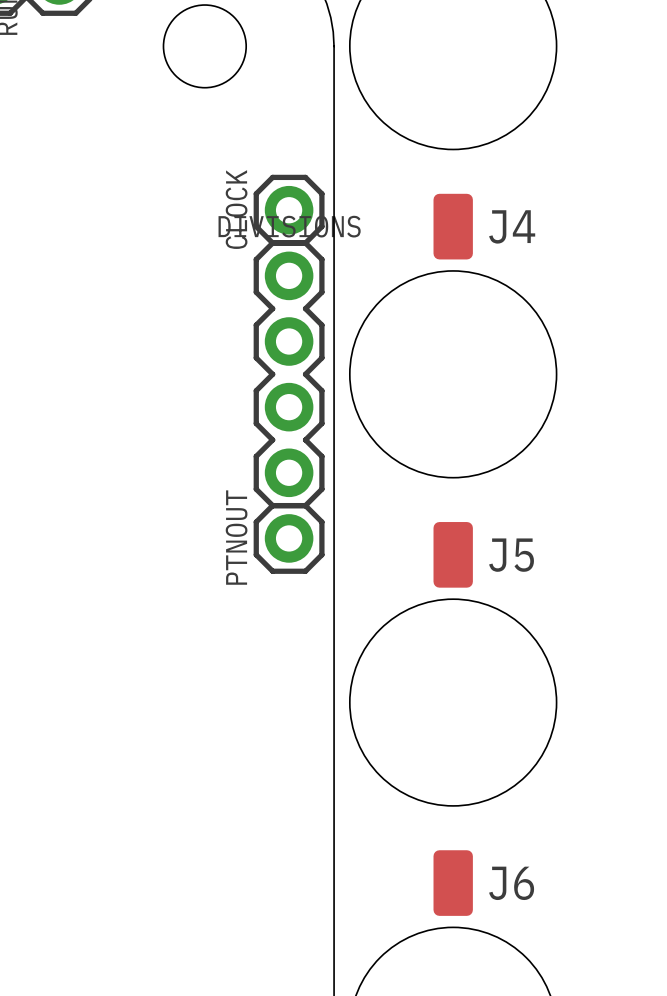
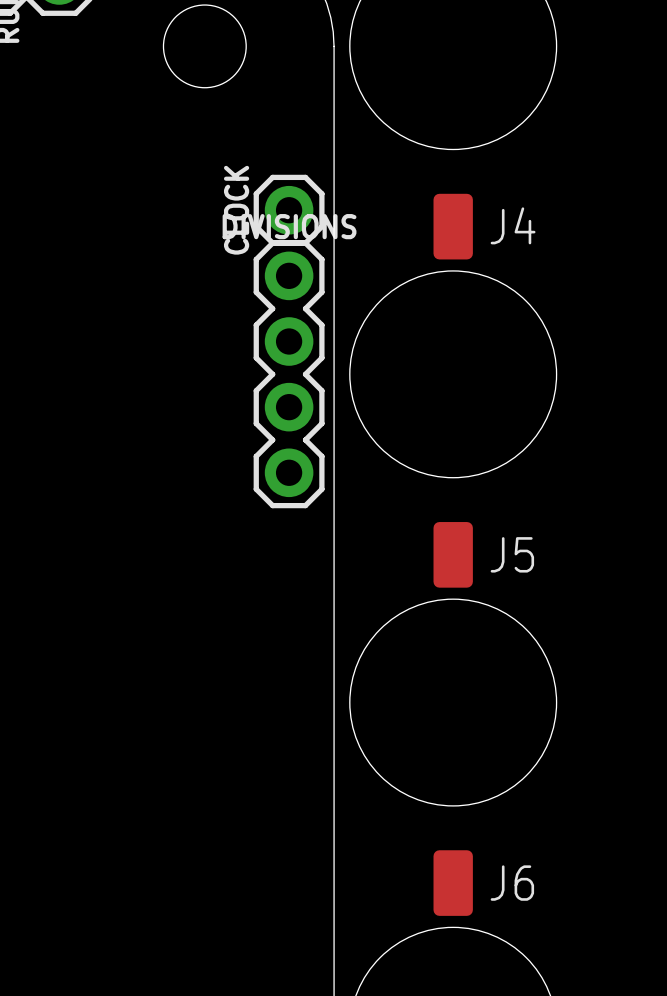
PTNOUT: (289, 538) -> none

